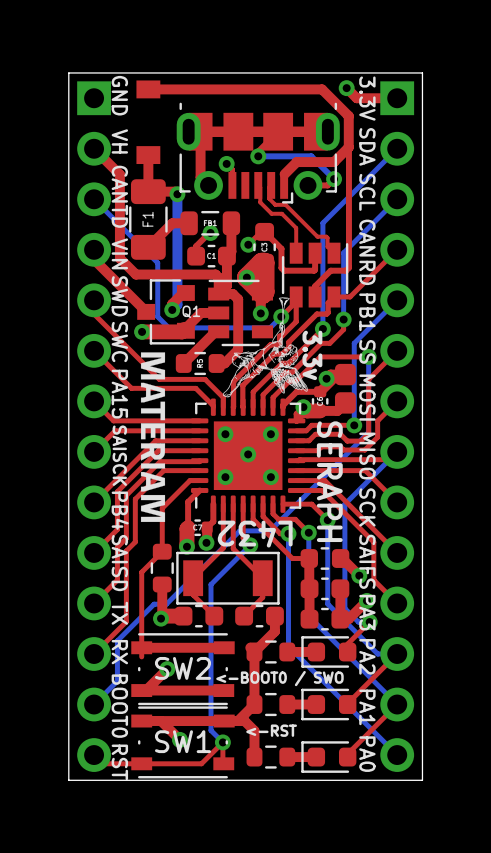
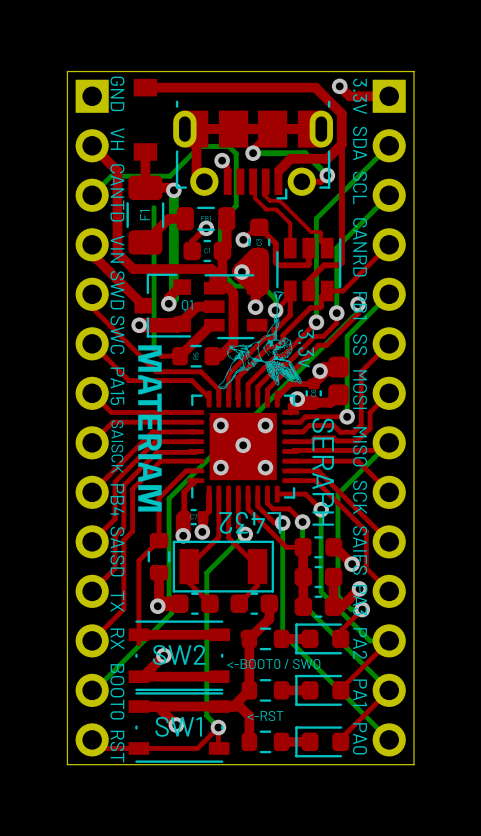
bottom track: (94, 199) (157, 262) (157, 316) (168, 327) (270, 327) (281, 316) -> (92, 195) (111, 176) (170, 176) (199, 146) (228, 146) (236, 153) (236, 205) (220, 221) (220, 271) (235, 286) (262, 286) (275, 299) (275, 310)
bottom track: none -> (154, 207) (154, 348)
top track: none -> (154, 348) (161, 356) (180, 356)
top track: (320, 356) (368, 356) -> (313, 349) (318, 345) (326, 345) (358, 314) (358, 304)
bottom track: (368, 356) (368, 432) (270, 530) (239, 530) (166, 604) (154, 604) (117, 640) (117, 681) (94, 704) -> (358, 304) (358, 312) (169, 498) (169, 596) (171, 599) (171, 613) (94, 690) (92, 690)
via position: (368, 356) -> (358, 304)

